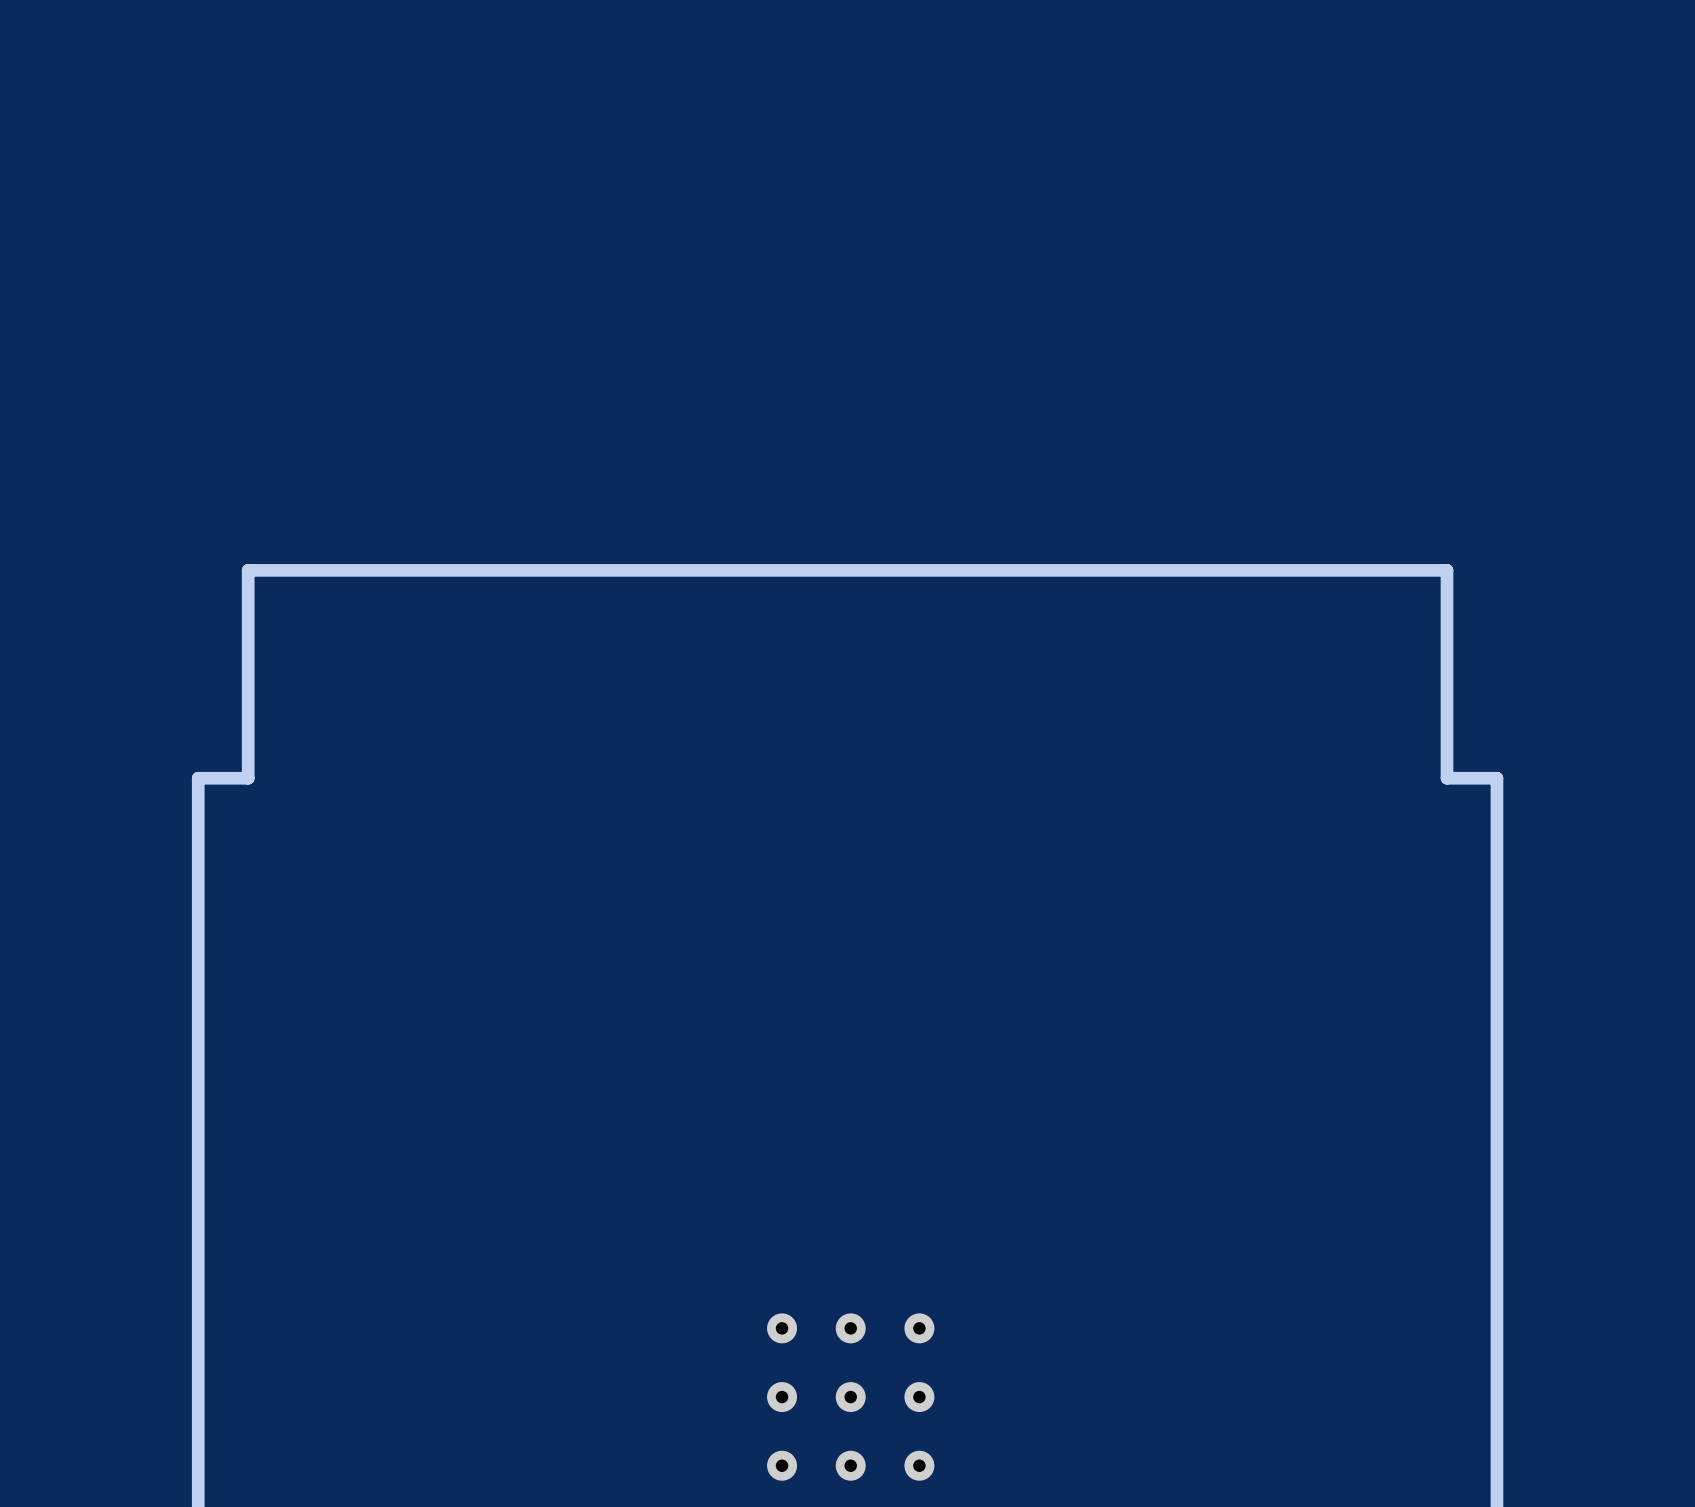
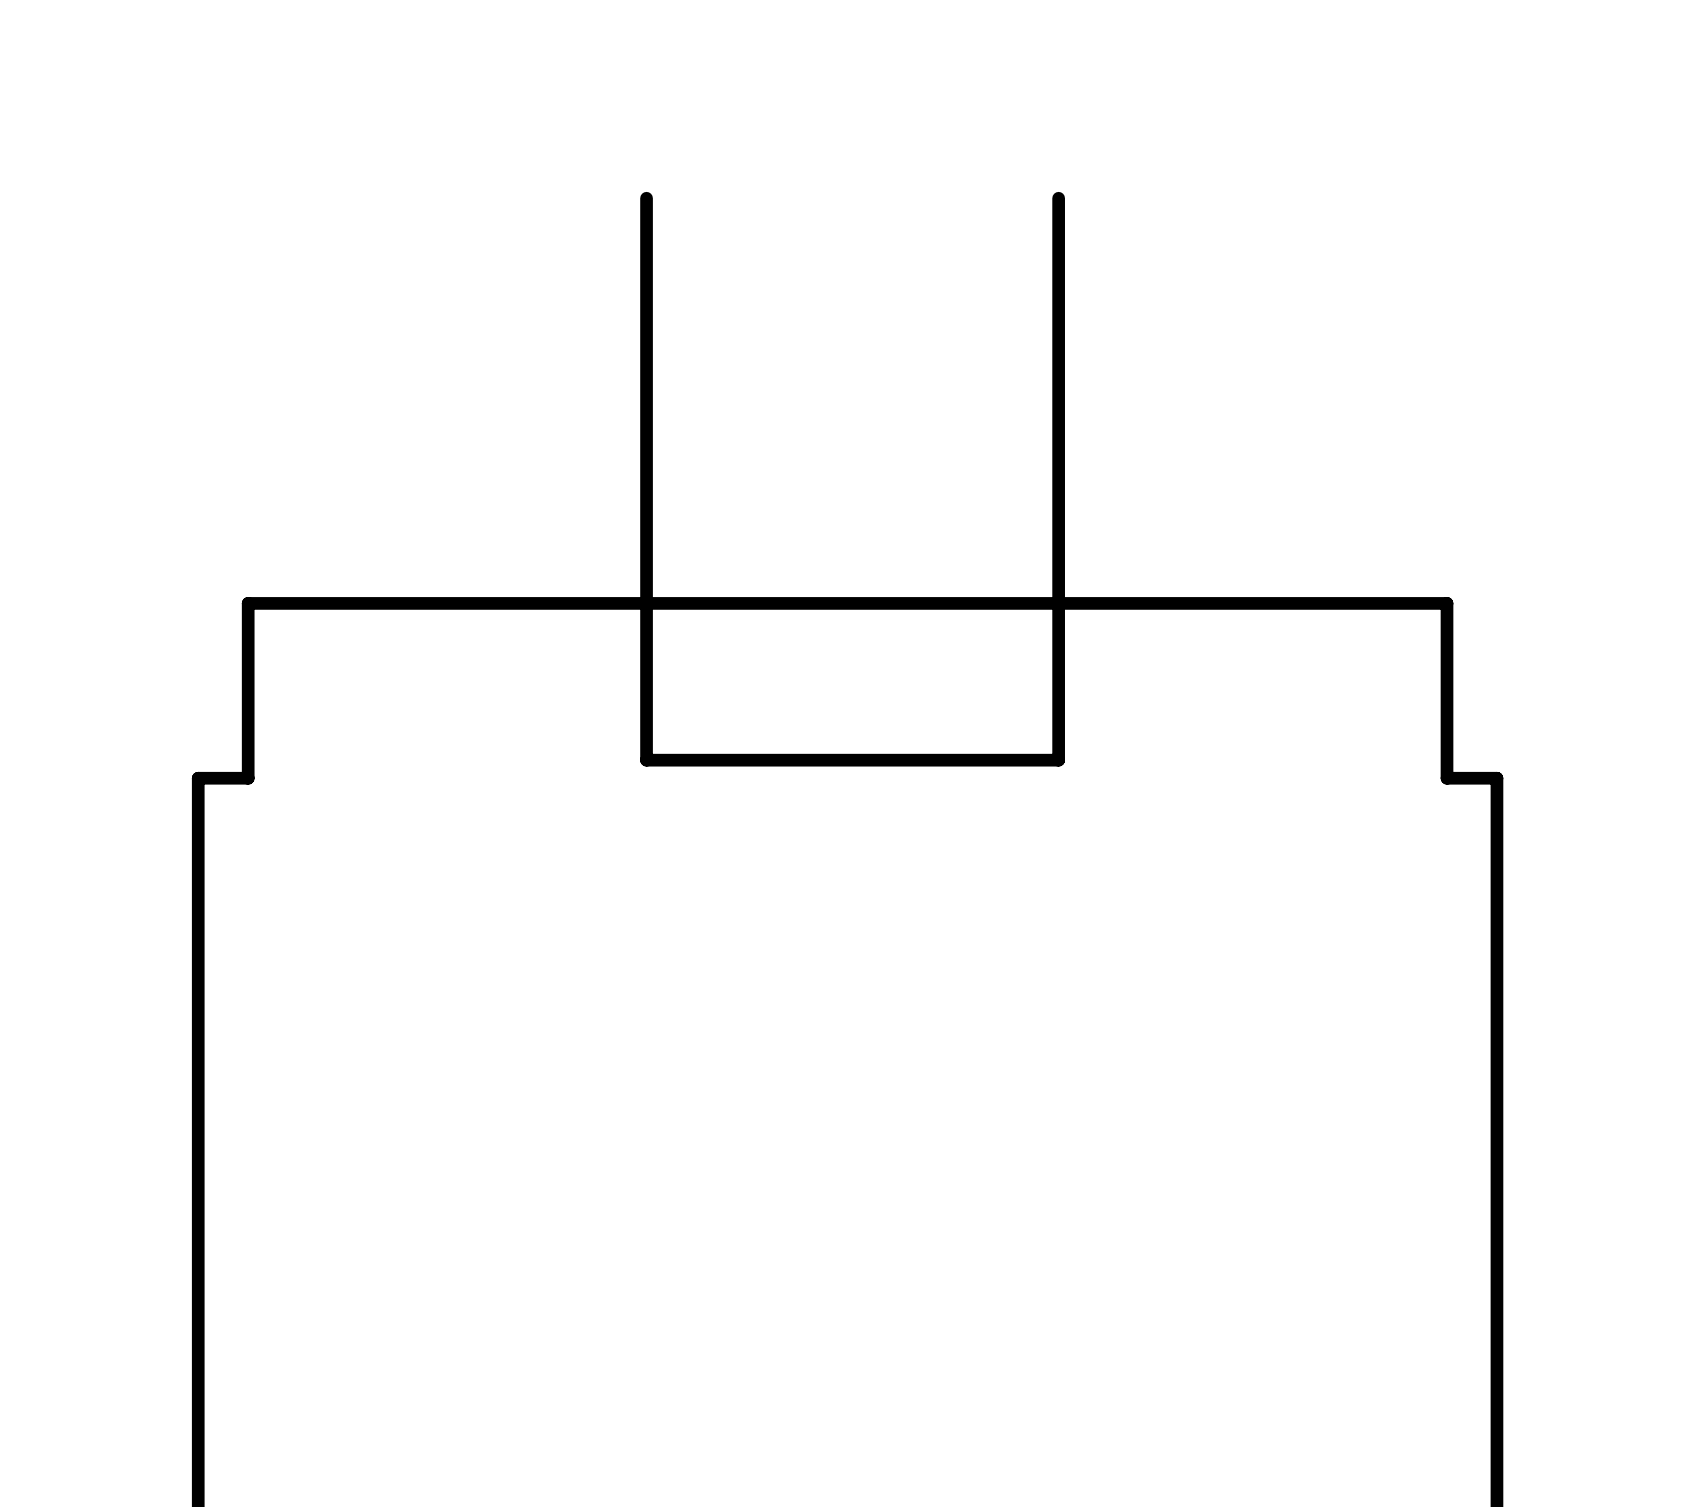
part: none -> (852, 479)
board edge: (1447, 603) (1447, 570) (248, 570) (248, 603) -> (1447, 603) (248, 603)
part: (850, 1397) -> none

